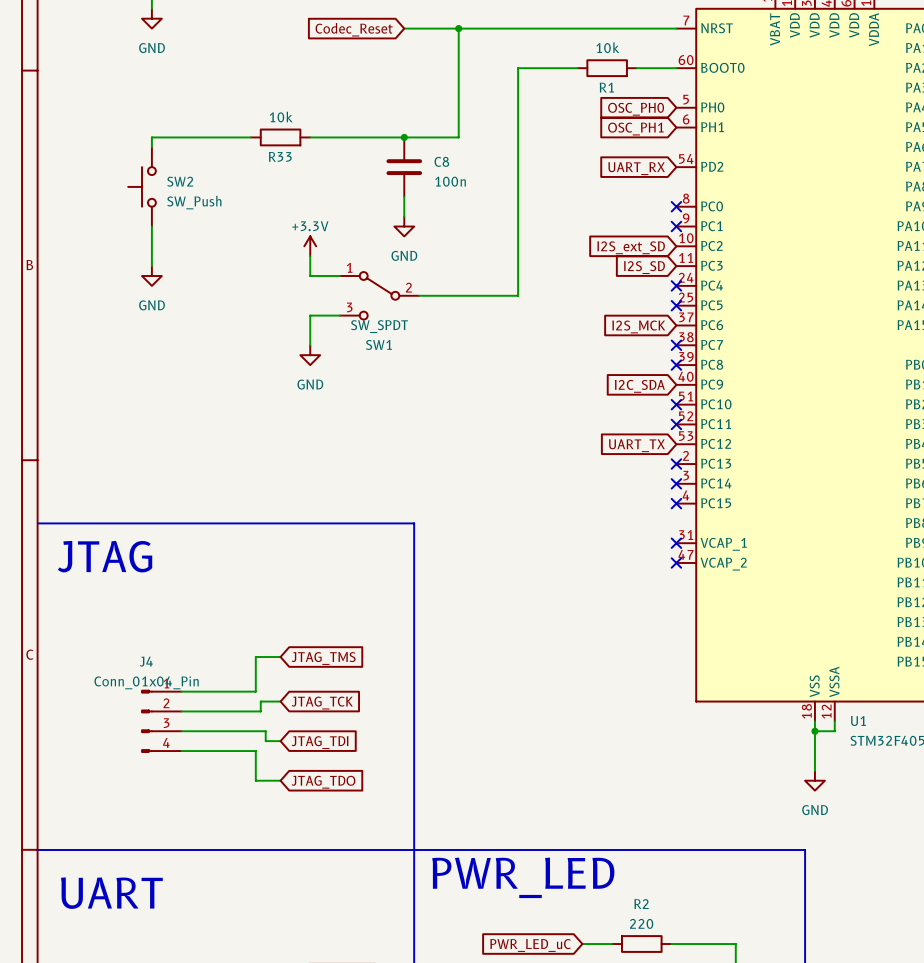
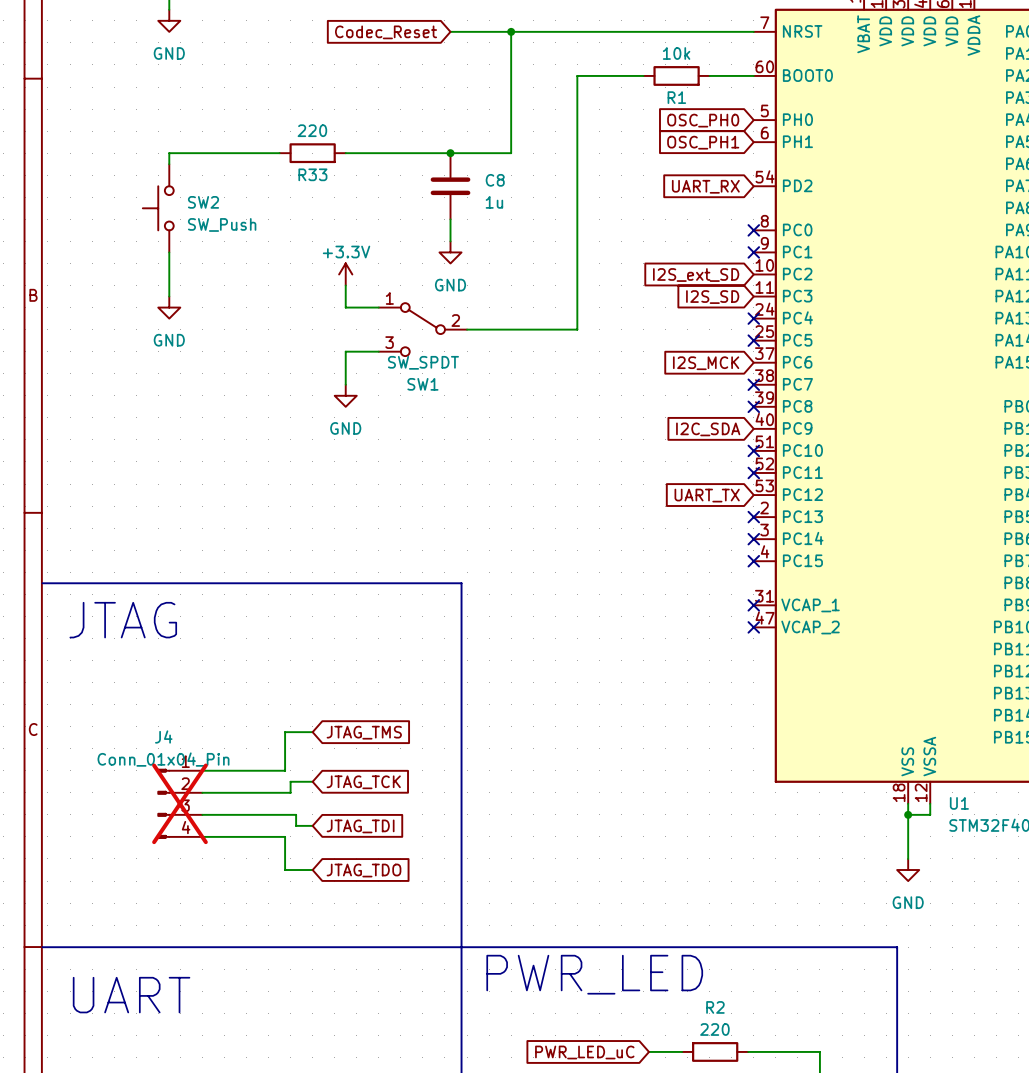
R33 value: 10k (281, 117) -> 220 (312, 130)
C8 value: 100n (450, 181) -> 1u (494, 202)
J4 do-not-place cross: none -> (179, 803)

